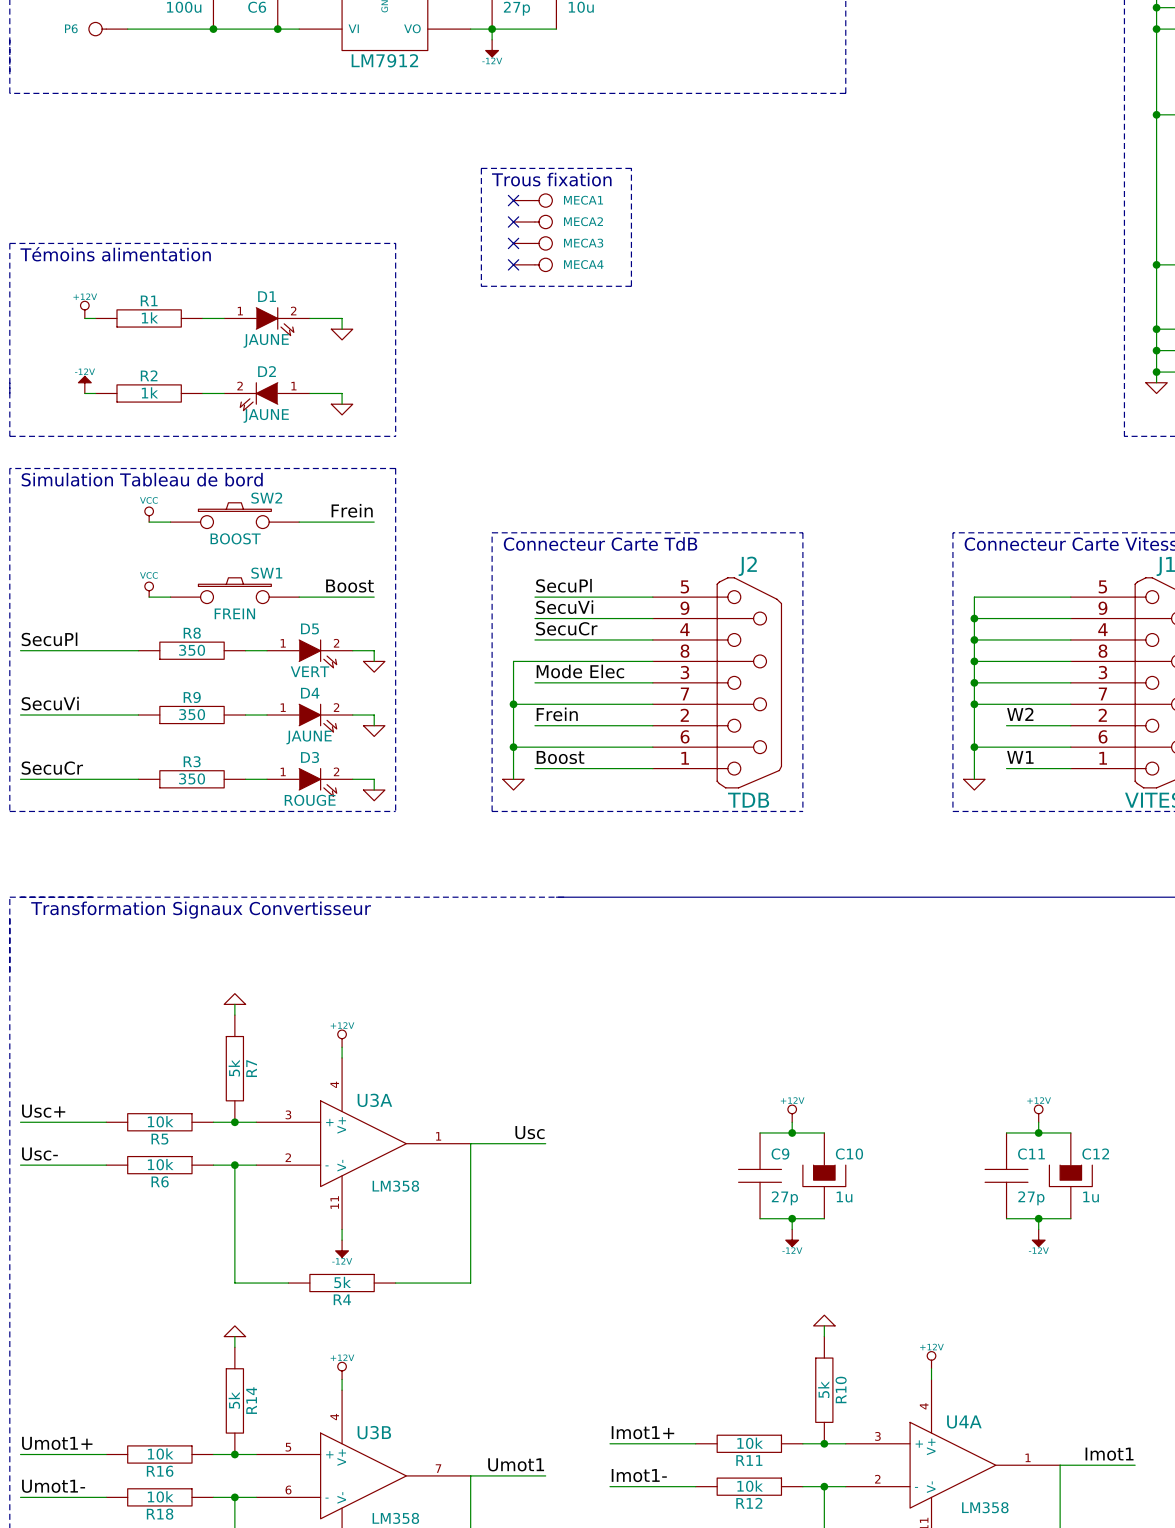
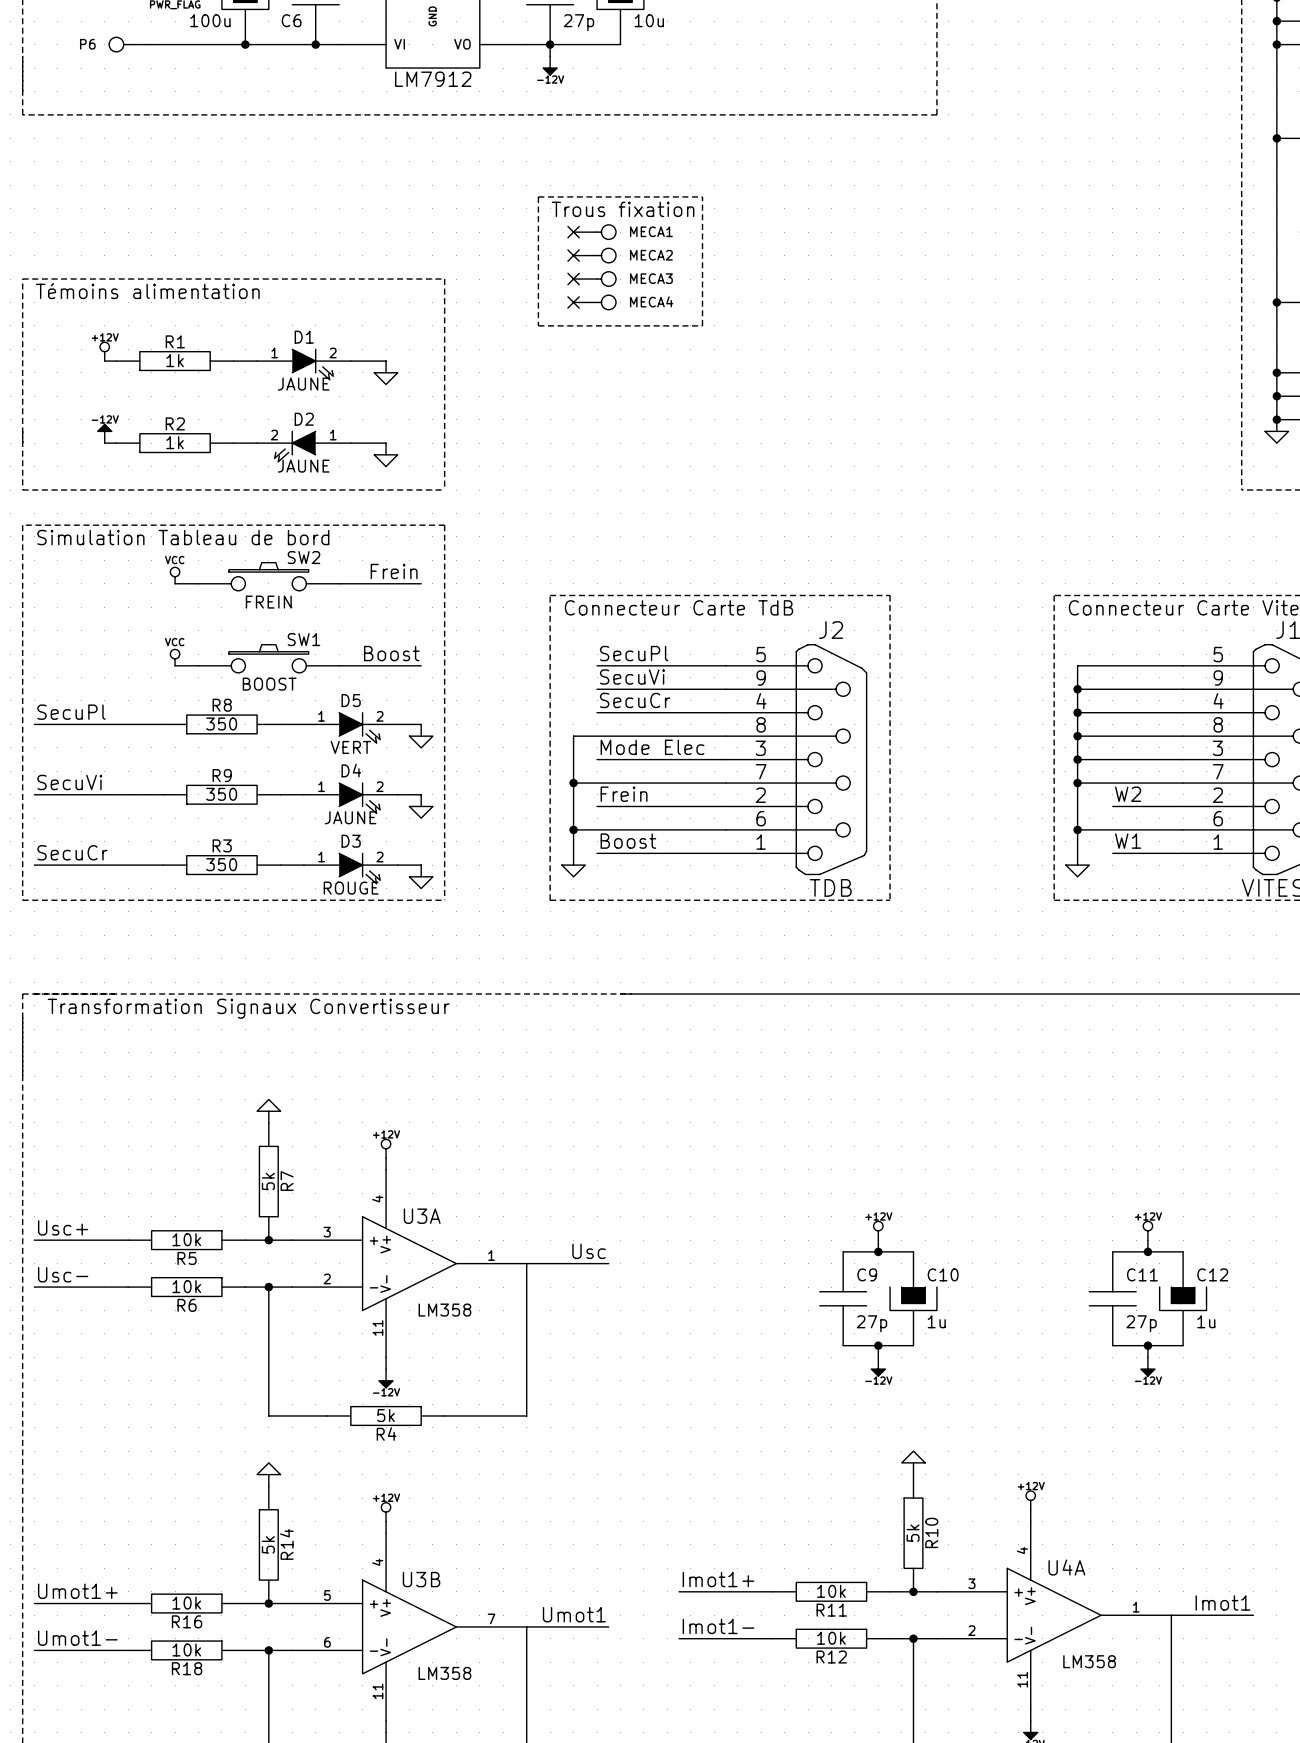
SW2 value: BOOST (235, 538) -> FREIN (268, 602)
SW1 value: FREIN (234, 613) -> BOOST (269, 684)

